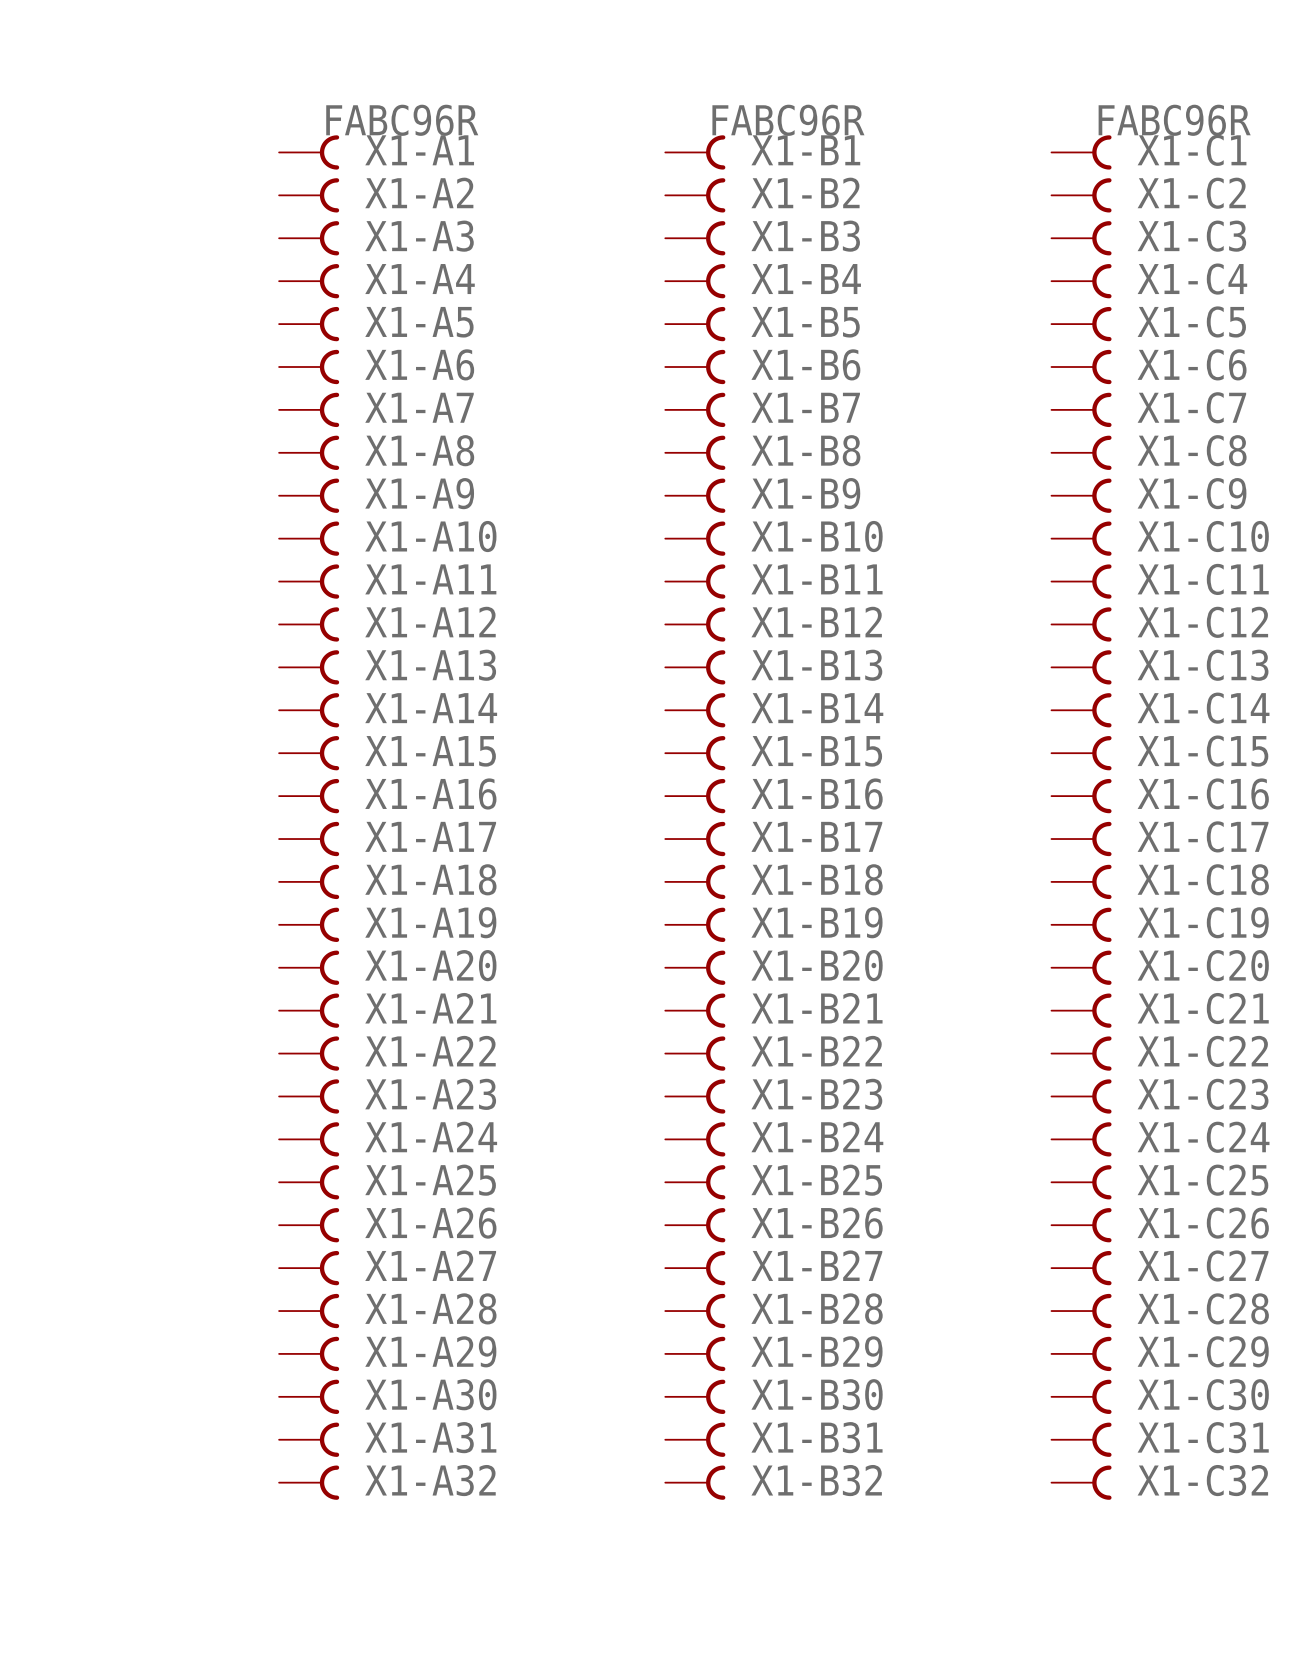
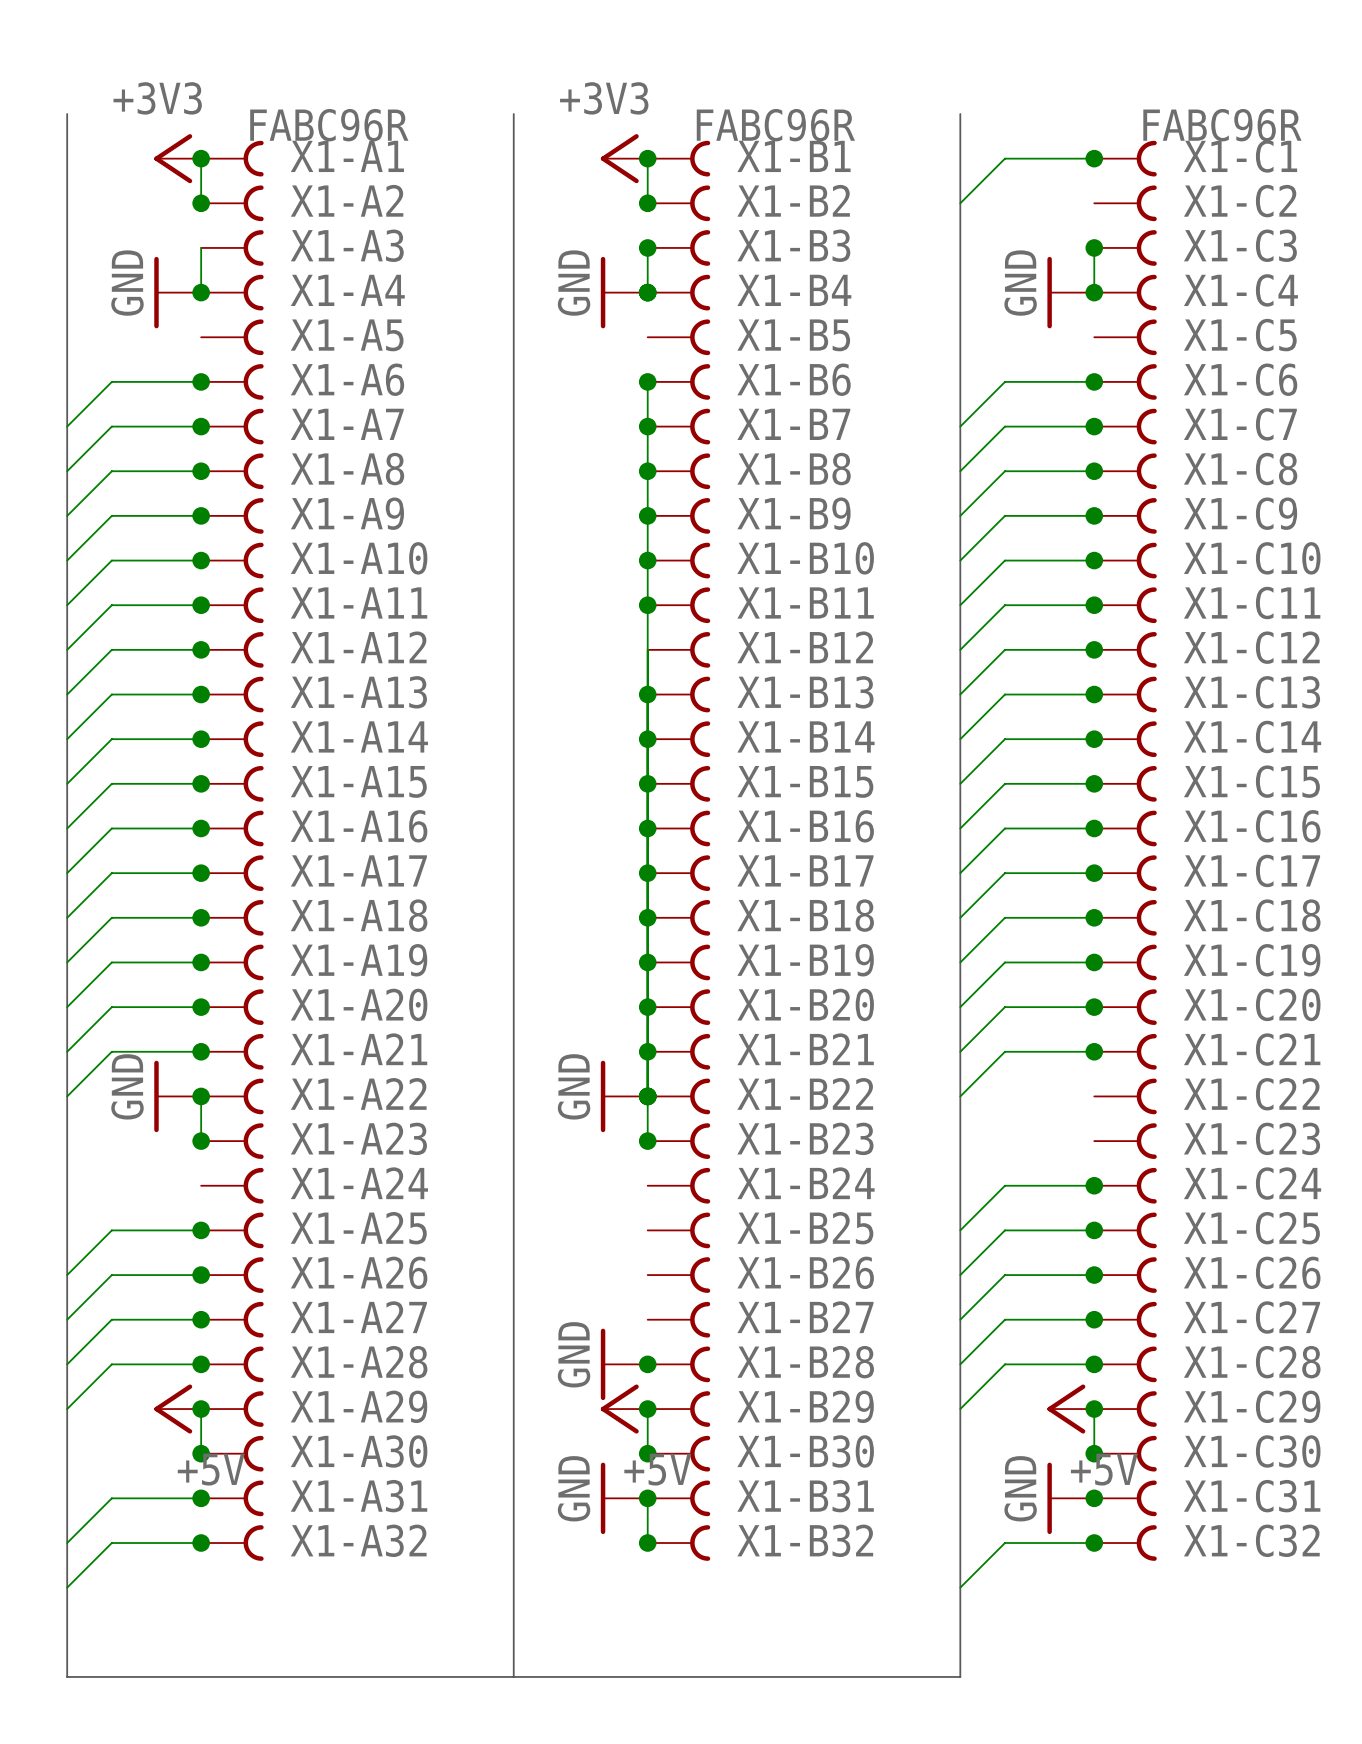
bus: none -> (67, 113) (67, 1676) (960, 1676) (960, 113)
bus: none -> (513, 113) (513, 1676)
power symbol: none -> +3V3 (177, 158)
wire: none -> (201, 158) (201, 203)
junction: none -> (201, 158)
X1-A1 position: (309, 152) -> (232, 158)
power symbol: none -> +3V3 (624, 158)
wire: none -> (647, 158) (647, 203)
junction: none -> (647, 158)
X1-B1 position: (695, 152) -> (678, 158)
wire: none -> (1094, 158) (1004, 158) (960, 203)
junction: none -> (1094, 158)
junction: none -> (201, 203)
X1-A2 position: (309, 195) -> (232, 203)
junction: none -> (647, 203)
X1-B2 position: (695, 195) -> (678, 203)
wire: none -> (201, 247) (201, 292)
X1-A3 position: (309, 238) -> (232, 247)
wire: none -> (647, 247) (647, 292)
junction: none -> (647, 247)
X1-B3 position: (695, 238) -> (678, 247)
wire: none -> (1094, 247) (1094, 292)
junction: none -> (1094, 247)
power symbol: none -> GND (177, 292)
junction: none -> (201, 292)
X1-A4 position: (309, 281) -> (232, 292)
power symbol: none -> GND (624, 292)
junction: none -> (647, 292)
X1-B4 position: (695, 281) -> (678, 292)
power symbol: none -> GND (1070, 292)
junction: none -> (1094, 292)
X1-A5 position: (309, 324) -> (232, 337)
X1-B5 position: (695, 324) -> (678, 337)
wire: none -> (201, 381) (111, 381) (67, 426)
junction: none -> (201, 381)
X1-A6 position: (309, 367) -> (232, 381)
wire: none -> (647, 381) (647, 1141)
junction: none -> (647, 381)
X1-B6 position: (695, 367) -> (678, 381)
wire: none -> (1094, 381) (1004, 381) (960, 426)
junction: none -> (1094, 381)
wire: none -> (201, 426) (111, 426) (67, 471)
junction: none -> (201, 426)
X1-A7 position: (309, 409) -> (232, 426)
junction: none -> (647, 426)
X1-B7 position: (695, 409) -> (678, 426)
wire: none -> (1094, 426) (1004, 426) (960, 471)
junction: none -> (1094, 426)
wire: none -> (201, 471) (111, 471) (67, 515)
junction: none -> (201, 471)
X1-A8 position: (309, 452) -> (232, 471)
junction: none -> (647, 471)
X1-B8 position: (695, 452) -> (678, 471)
wire: none -> (1094, 471) (1004, 471) (960, 515)
junction: none -> (1094, 471)
wire: none -> (201, 515) (111, 515) (67, 560)
junction: none -> (201, 515)
X1-A9 position: (309, 495) -> (232, 515)
junction: none -> (647, 515)
X1-B9 position: (695, 495) -> (678, 515)
wire: none -> (1094, 515) (1004, 515) (960, 560)
junction: none -> (1094, 515)
wire: none -> (201, 560) (111, 560) (67, 605)
junction: none -> (201, 560)
X1-A10 position: (309, 538) -> (232, 560)
junction: none -> (647, 560)
X1-B10 position: (695, 538) -> (678, 560)
wire: none -> (1094, 560) (1004, 560) (960, 605)
junction: none -> (1094, 560)
wire: none -> (201, 605) (111, 605) (67, 649)
junction: none -> (201, 605)
X1-A11 position: (309, 581) -> (232, 605)
junction: none -> (647, 605)
X1-B11 position: (695, 581) -> (678, 605)
wire: none -> (1094, 605) (1004, 605) (960, 649)
junction: none -> (1094, 605)
wire: none -> (201, 649) (111, 649) (67, 694)
junction: none -> (201, 649)
X1-A12 position: (309, 624) -> (232, 649)
X1-B12 position: (695, 624) -> (678, 649)
wire: none -> (1094, 649) (1004, 649) (960, 694)
junction: none -> (1094, 649)
wire: none -> (201, 694) (111, 694) (67, 739)
junction: none -> (201, 694)
X1-A13 position: (309, 667) -> (232, 694)
junction: none -> (647, 694)
X1-B13 position: (695, 667) -> (678, 694)
wire: none -> (1094, 694) (1004, 694) (960, 739)
junction: none -> (1094, 694)
wire: none -> (201, 739) (111, 739) (67, 783)
junction: none -> (201, 739)
X1-A14 position: (309, 710) -> (232, 739)
junction: none -> (647, 739)
X1-B14 position: (695, 710) -> (678, 739)
wire: none -> (1094, 739) (1004, 739) (960, 783)
junction: none -> (1094, 739)
wire: none -> (201, 783) (111, 783) (67, 828)
junction: none -> (201, 783)
X1-A15 position: (309, 753) -> (232, 783)
junction: none -> (647, 783)
X1-B15 position: (695, 753) -> (678, 783)
wire: none -> (1094, 783) (1004, 783) (960, 828)
junction: none -> (1094, 783)
wire: none -> (201, 828) (111, 828) (67, 873)
junction: none -> (201, 828)
X1-A16 position: (309, 796) -> (232, 828)
junction: none -> (647, 828)
X1-B16 position: (695, 796) -> (678, 828)
wire: none -> (1094, 828) (1004, 828) (960, 873)
junction: none -> (1094, 828)
wire: none -> (201, 873) (111, 873) (67, 917)
junction: none -> (201, 873)
X1-A17 position: (309, 839) -> (232, 873)
junction: none -> (647, 873)
X1-B17 position: (695, 839) -> (678, 873)
wire: none -> (1094, 873) (1004, 873) (960, 917)
junction: none -> (1094, 873)
wire: none -> (201, 917) (111, 917) (67, 962)
junction: none -> (201, 917)
X1-A18 position: (309, 881) -> (232, 917)
junction: none -> (647, 917)
X1-B18 position: (695, 881) -> (678, 917)
wire: none -> (1094, 917) (1004, 917) (960, 962)
junction: none -> (1094, 917)
wire: none -> (201, 962) (111, 962) (67, 1007)
junction: none -> (201, 962)
X1-A19 position: (309, 924) -> (232, 962)
junction: none -> (647, 962)
X1-B19 position: (695, 924) -> (678, 962)
wire: none -> (1094, 962) (1004, 962) (960, 1007)
junction: none -> (1094, 962)
wire: none -> (201, 1007) (111, 1007) (67, 1051)
junction: none -> (201, 1007)
X1-A20 position: (309, 967) -> (232, 1007)
junction: none -> (647, 1007)
X1-B20 position: (695, 967) -> (678, 1007)
wire: none -> (1094, 1007) (1004, 1007) (960, 1051)
junction: none -> (1094, 1007)
wire: none -> (201, 1051) (111, 1051) (67, 1096)
junction: none -> (201, 1051)
X1-A21 position: (309, 1010) -> (232, 1051)
junction: none -> (647, 1051)
X1-B21 position: (695, 1010) -> (678, 1051)
wire: none -> (1094, 1051) (1004, 1051) (960, 1096)
junction: none -> (1094, 1051)
power symbol: none -> GND (177, 1096)
wire: none -> (201, 1096) (201, 1141)
junction: none -> (201, 1096)
X1-A22 position: (309, 1053) -> (232, 1096)
power symbol: none -> GND (624, 1096)
junction: none -> (647, 1096)
X1-B22 position: (695, 1053) -> (678, 1096)
junction: none -> (201, 1141)
X1-A23 position: (309, 1096) -> (232, 1141)
junction: none -> (647, 1141)
X1-B23 position: (695, 1096) -> (678, 1141)
X1-A24 position: (309, 1139) -> (232, 1185)
X1-B24 position: (695, 1139) -> (678, 1185)
wire: none -> (1094, 1185) (1004, 1185) (960, 1230)
junction: none -> (1094, 1185)
wire: none -> (201, 1230) (111, 1230) (67, 1275)
junction: none -> (201, 1230)
X1-A25 position: (309, 1182) -> (232, 1230)
X1-B25 position: (695, 1182) -> (678, 1230)
wire: none -> (1094, 1230) (1004, 1230) (960, 1275)
junction: none -> (1094, 1230)
wire: none -> (201, 1275) (111, 1275) (67, 1319)
junction: none -> (201, 1275)
X1-A26 position: (309, 1225) -> (232, 1275)
X1-B26 position: (695, 1225) -> (678, 1275)
wire: none -> (1094, 1275) (1004, 1275) (960, 1319)
junction: none -> (1094, 1275)
wire: none -> (201, 1319) (111, 1319) (67, 1364)
junction: none -> (201, 1319)
X1-A27 position: (309, 1268) -> (232, 1319)
X1-B27 position: (695, 1268) -> (678, 1319)
wire: none -> (1094, 1319) (1004, 1319) (960, 1364)
junction: none -> (1094, 1319)
wire: none -> (201, 1364) (111, 1364) (67, 1409)
junction: none -> (201, 1364)
X1-A28 position: (309, 1311) -> (232, 1364)
power symbol: none -> GND (624, 1364)
junction: none -> (647, 1364)
X1-B28 position: (695, 1311) -> (678, 1364)
wire: none -> (1094, 1364) (1004, 1364) (960, 1409)
junction: none -> (1094, 1364)
power symbol: none -> +5V (177, 1409)
wire: none -> (201, 1409) (201, 1453)
junction: none -> (201, 1409)
X1-A29 position: (309, 1353) -> (232, 1409)
power symbol: none -> +5V (624, 1409)
wire: none -> (647, 1409) (647, 1453)
junction: none -> (647, 1409)
X1-B29 position: (695, 1353) -> (678, 1409)
power symbol: none -> +5V (1070, 1409)
wire: none -> (1094, 1409) (1094, 1453)
junction: none -> (1094, 1409)
junction: none -> (201, 1453)
X1-A30 position: (309, 1396) -> (232, 1453)
junction: none -> (647, 1453)
X1-B30 position: (695, 1396) -> (678, 1453)
junction: none -> (1094, 1453)
wire: none -> (201, 1498) (111, 1498) (67, 1543)
junction: none -> (201, 1498)
X1-A31 position: (309, 1439) -> (232, 1498)
power symbol: none -> GND (624, 1498)
wire: none -> (647, 1498) (647, 1543)
junction: none -> (647, 1498)
X1-B31 position: (695, 1439) -> (678, 1498)
power symbol: none -> GND (1070, 1498)
junction: none -> (1094, 1498)
wire: none -> (201, 1543) (111, 1543) (67, 1587)
junction: none -> (201, 1543)
X1-A32 position: (309, 1482) -> (232, 1543)
junction: none -> (647, 1543)
X1-B32 position: (695, 1482) -> (678, 1543)
wire: none -> (1094, 1543) (1004, 1543) (960, 1587)
junction: none -> (1094, 1543)

